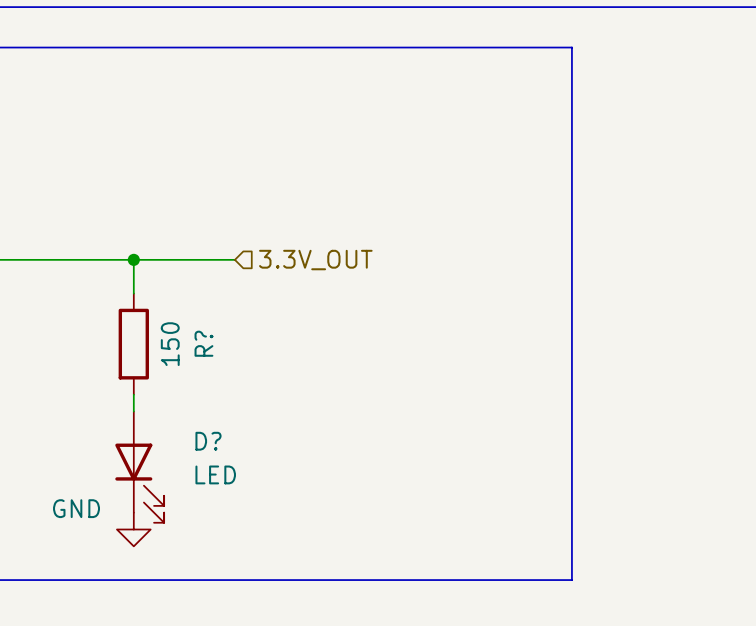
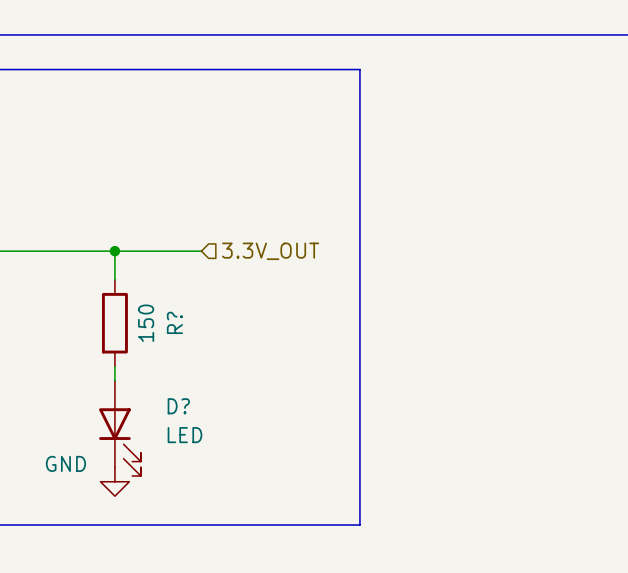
line: (420, 47) (571, 47) (571, 580) (420, 580) -> (359, 69) (359, 525)

